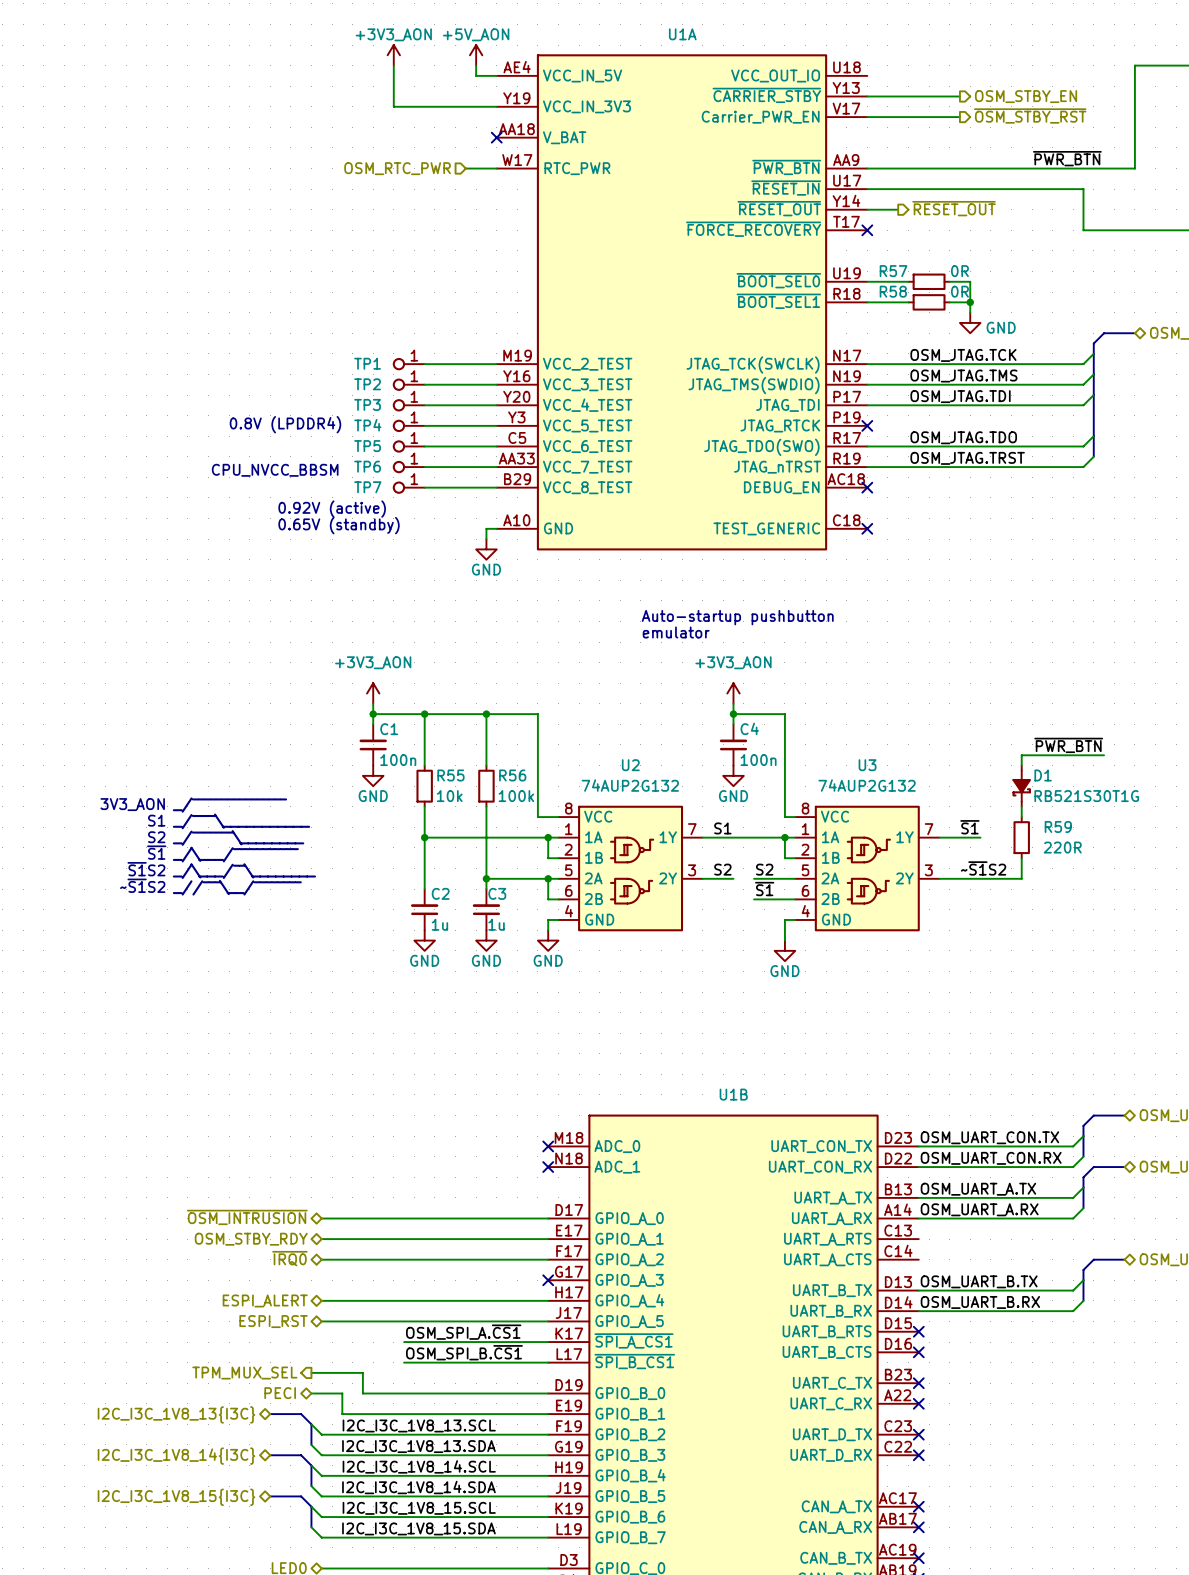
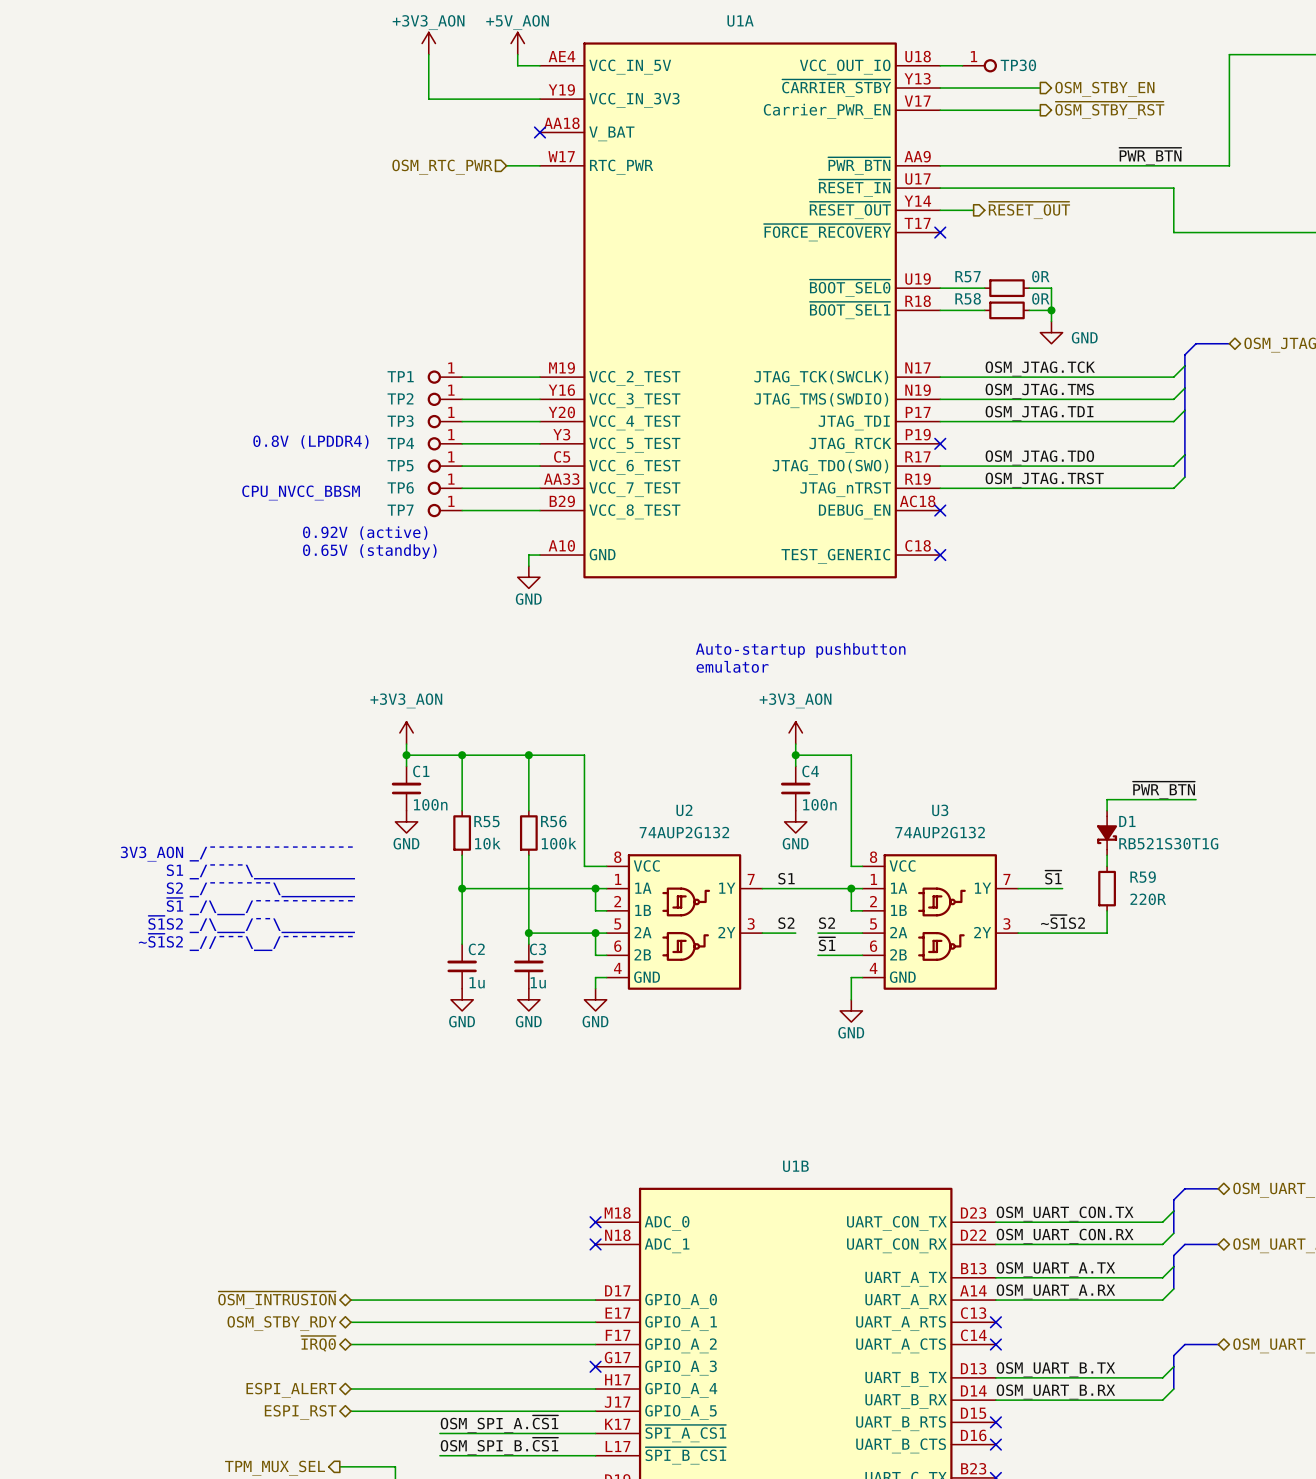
wire: none -> (940, 65) (962, 65)
TP30: none -> (979, 65)
no-connect mark: none -> (995, 1322)
no-connect mark: none -> (995, 1344)

